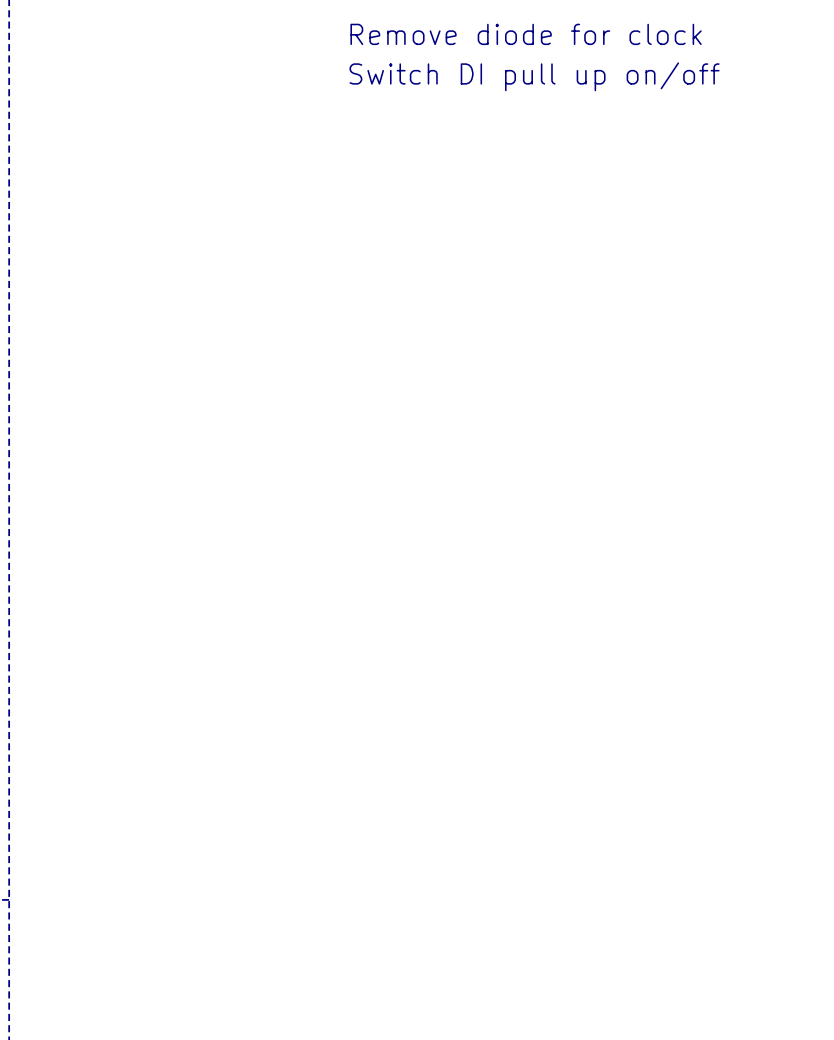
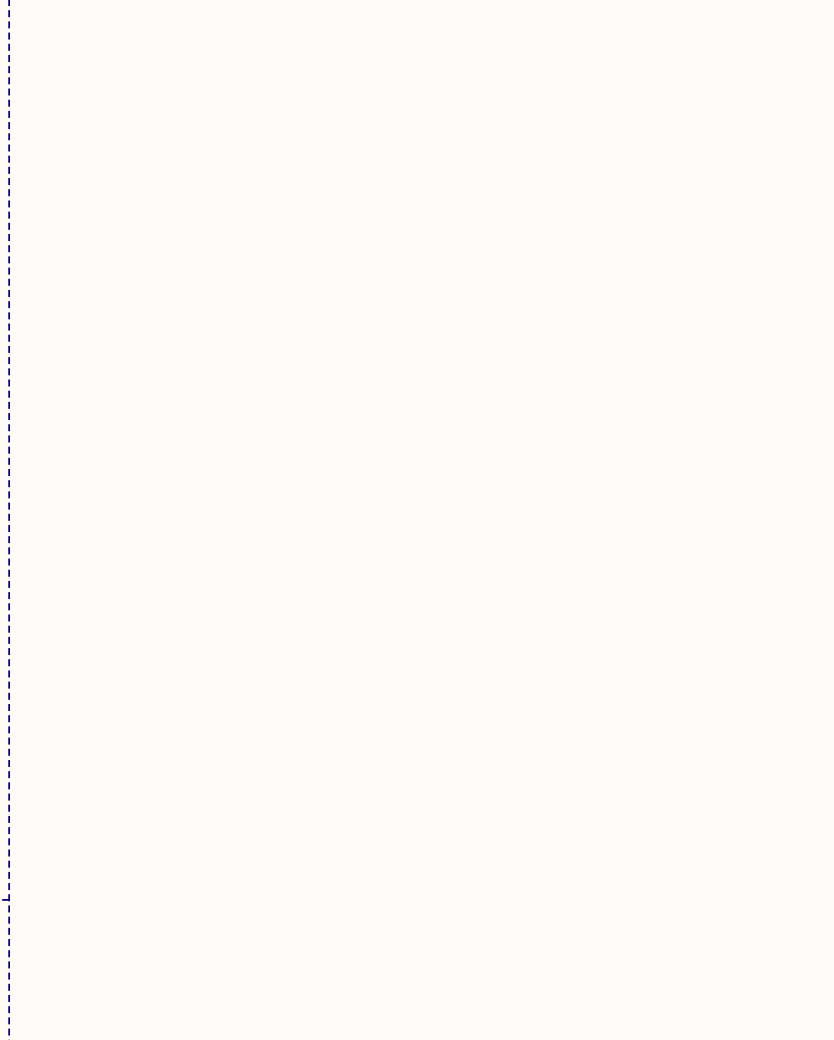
text: Remove diode for clock (526, 34) -> none
text: Switch DI pull up on/off (534, 76) -> none

